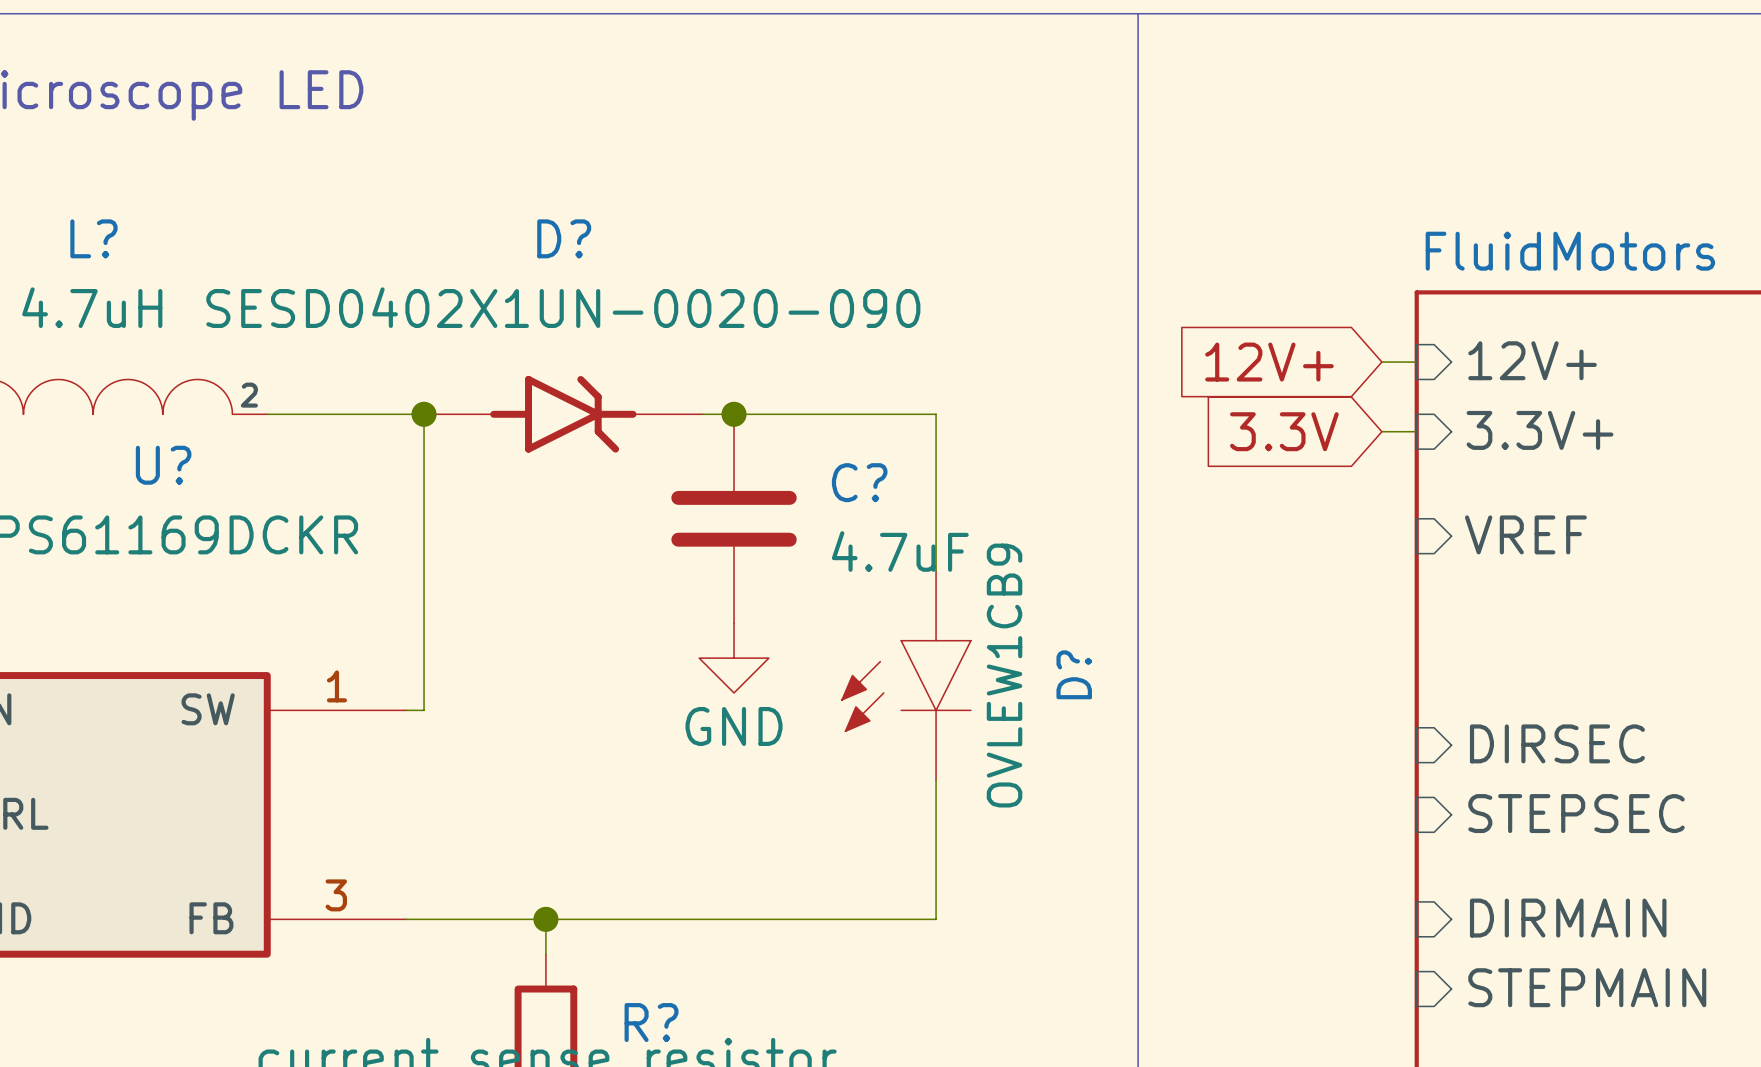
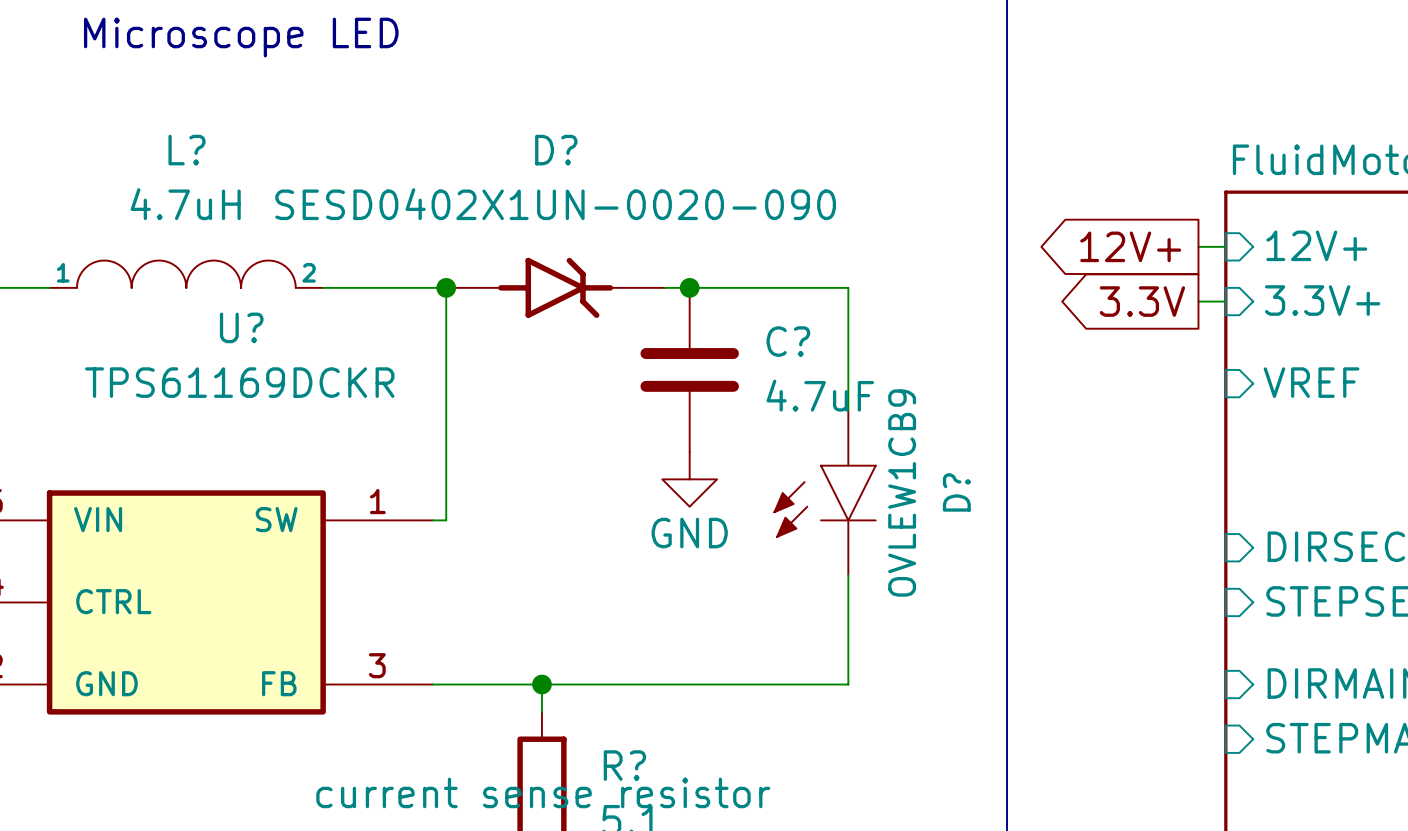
global label shape: input (1269, 362) -> output (1130, 246)
global label shape: input (1284, 431) -> output (1142, 301)

